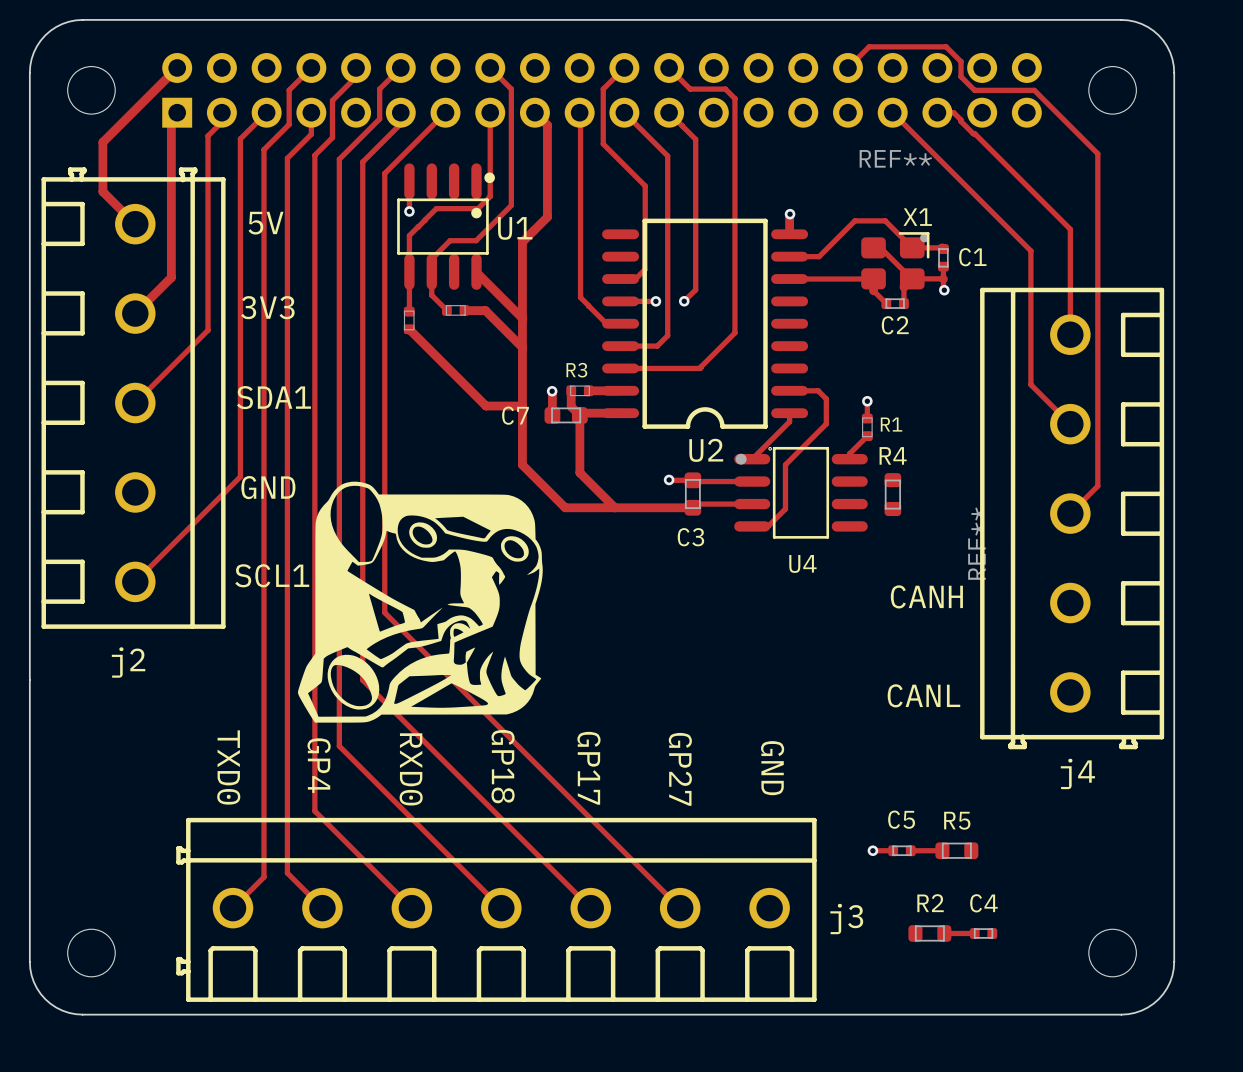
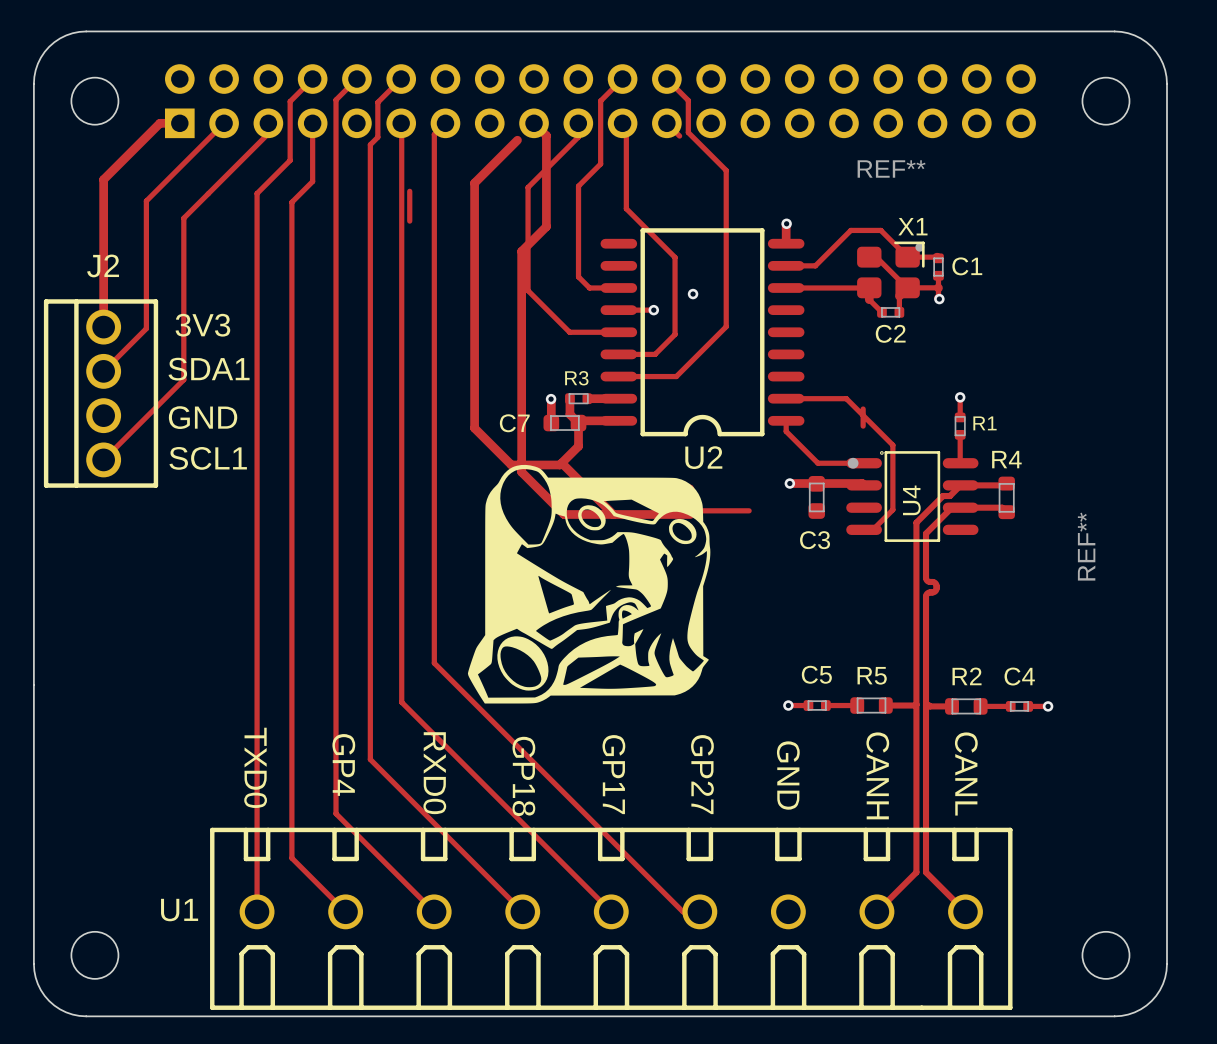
track: (177, 67) (102, 142) (102, 191) (135, 224) -> none
track: (356, 67) (356, 76) (332, 100) (332, 137) (314, 155) (314, 811) (411, 908) -> (356, 79) (336, 99) (336, 813) (434, 911)
track: (490, 67) (511, 89) (511, 205) (476, 240) (450, 240) (431, 259) (431, 295) (446, 310) -> none
track: (847, 67) (869, 46) (946, 46) (961, 61) (961, 76) (974, 90) (1034, 90) (1097, 153) (1097, 486) (1070, 513) -> none
track: (379, 89) (379, 118) (339, 159) (339, 746) (501, 908) -> (380, 99) (377, 102) (377, 137) (370, 144) (370, 759) (522, 911)
track: (603, 89) (603, 144) (645, 186) (645, 269) (635, 279) (620, 279) -> (601, 99) (600, 164) (578, 186) (578, 276) (589, 287) (612, 287)
track: (690, 89) (725, 89) (734, 98) (734, 332) (700, 368) (678, 368) -> (687, 99) (688, 132) (726, 170) (726, 326) (676, 376)
track: (289, 90) (289, 124) (264, 149) (264, 877) (233, 908) -> (290, 101) (290, 160) (257, 193) (256, 911)
track: (177, 112) (171, 118) (171, 277) (135, 313) -> (179, 123) (159, 123) (103, 179) (103, 327)
track: (221, 112) (221, 122) (208, 135) (208, 330) (135, 403) -> (224, 123) (146, 201) (146, 328) (103, 371)
track: (266, 112) (240, 138) (240, 476) (135, 581) -> none
track: (400, 112) (400, 123) (362, 161) (362, 680) (590, 908) -> (401, 123) (401, 702) (611, 911)
track: (490, 112) (490, 196) (478, 208) (436, 208) (425, 219) -> none
track: (579, 112) (580, 297) (588, 305) -> (578, 123) (578, 137) (528, 187) (528, 290) (569, 332) (604, 332)
track: (892, 112) (1030, 250) (1030, 384) (1070, 424) -> none
track: (937, 112) (953, 112) (1070, 229) (1070, 334) -> none
track: (628, 116) (667, 156) (667, 335) -> (626, 127) (626, 208) (675, 257) (675, 334) (665, 344)
track: none -> (268, 133) (183, 218) (183, 379) (103, 459)
track: (434, 123) (384, 173) (384, 612) (680, 908) -> (434, 134) (434, 663) (683, 911) (699, 911)
track: (681, 125) (695, 139) (695, 289) (684, 301) -> none
track: none -> (517, 140) (474, 183) (474, 428) (511, 464) (559, 464) (578, 446)
track: (311, 134) (287, 158) (287, 873) (322, 908) -> (312, 144) (312, 181) (291, 202) (291, 858) (345, 911)
U1 footprint: [397, 163, 495, 290] -> [210, 827, 1013, 1010]
via: (409, 211) -> none
track: (425, 220) (418, 226) -> none
text: 5V (266, 223) -> none
track: (418, 226) (409, 235) (409, 311) -> none
U1 name position: U1 (515, 228) -> U1 (179, 910)
track: (476, 271) (522, 318) -> none
via position: (684, 301) -> (693, 294)
track: (588, 305) (606, 323) -> none
text position: 3V3 (267, 307) -> 3V3 (202, 325)
part: (455, 310) -> none
track: (464, 310) (485, 310) (522, 347) -> none
part: (409, 320) -> none
track: (409, 329) (486, 406) (522, 406) -> none
J2: none -> (101, 393)
track: none -> (960, 397) (960, 417)
via: none -> (960, 397)
track: (818, 390) (826, 398) (826, 423) (785, 464) (785, 509) (767, 526) (751, 526) -> (814, 398) (846, 398) (892, 445) (892, 509) (872, 529) (864, 529)
text position: SDA1 (274, 397) -> SDA1 (209, 369)
j2: (133, 398) -> none
via: (867, 401) -> none
track: (789, 421) (752, 459) -> (786, 429) (817, 463) (864, 463)
R1 position: (867, 427) -> (960, 426)
track: none -> (960, 434) (960, 463)
track: (867, 436) (849, 453) (849, 459) -> none
track: (579, 438) (579, 472) -> (561, 463) (578, 479)
track: none -> (789, 483) (862, 483) (864, 485) (876, 485)
via: none -> (789, 483)
track: none -> (1006, 483) (1004, 485) (960, 485) (950, 496) (943, 496) (916, 522) (916, 872) (876, 911)
via: (669, 479) -> none
track: (694, 481) (752, 481) -> none
text position: GND (268, 487) -> GND (203, 417)
U4 position: (800, 492) -> (912, 496)
C3 position: (692, 494) -> (816, 497)
R4 position: (892, 494) -> (1006, 497)
track: none -> (1006, 512) (1002, 507) (951, 507) (926, 533) (926, 578) (928, 581) (934, 582) (936, 586) (935, 591) (927, 593) (926, 596) (926, 872) (965, 911)
j4: (1072, 518) -> none
U4 name rotation: 0° (802, 563) -> 90° counterclockwise (911, 500)
U4 name position: U4 (802, 563) -> U4 (911, 500)
text position: SCL1 (272, 575) -> SCL1 (208, 458)
text rotation: 0° (926, 596) -> 90° clockwise (877, 775)
text position: CANH (926, 596) -> CANH (877, 775)
drawing position: (420, 602) -> (589, 584)
text rotation: 0° (923, 695) -> 90° clockwise (966, 774)
track: none -> (916, 704) (886, 705)
via: none -> (788, 705)
track: none -> (926, 705) (952, 706)
track: none -> (1028, 706) (1048, 706)
via: none -> (1048, 706)
text position: GP4 (319, 765) -> GP4 (343, 764)
text position: GP18 (503, 766) -> GP18 (523, 776)
text position: TXD0 (228, 767) -> TXD0 (255, 767)
text position: GP17 (588, 768) -> GP17 (613, 774)
text position: GND (772, 768) -> GND (788, 775)
text position: RXD0 (411, 769) -> RXD0 (434, 773)
text position: GP27 (680, 769) -> GP27 (702, 774)
track: (872, 850) (893, 850) -> (788, 705) (808, 705)
via: (872, 850) -> none
C5 position: (901, 850) -> (817, 705)
track: (910, 850) (942, 850) -> (825, 705) (857, 705)
R5 position: (956, 850) -> (871, 705)
j3: (496, 909) -> none
R2 position: (929, 933) -> (966, 706)
track: (944, 933) (974, 933) -> (980, 706) (1010, 706)
C4 position: (983, 933) -> (1019, 706)

